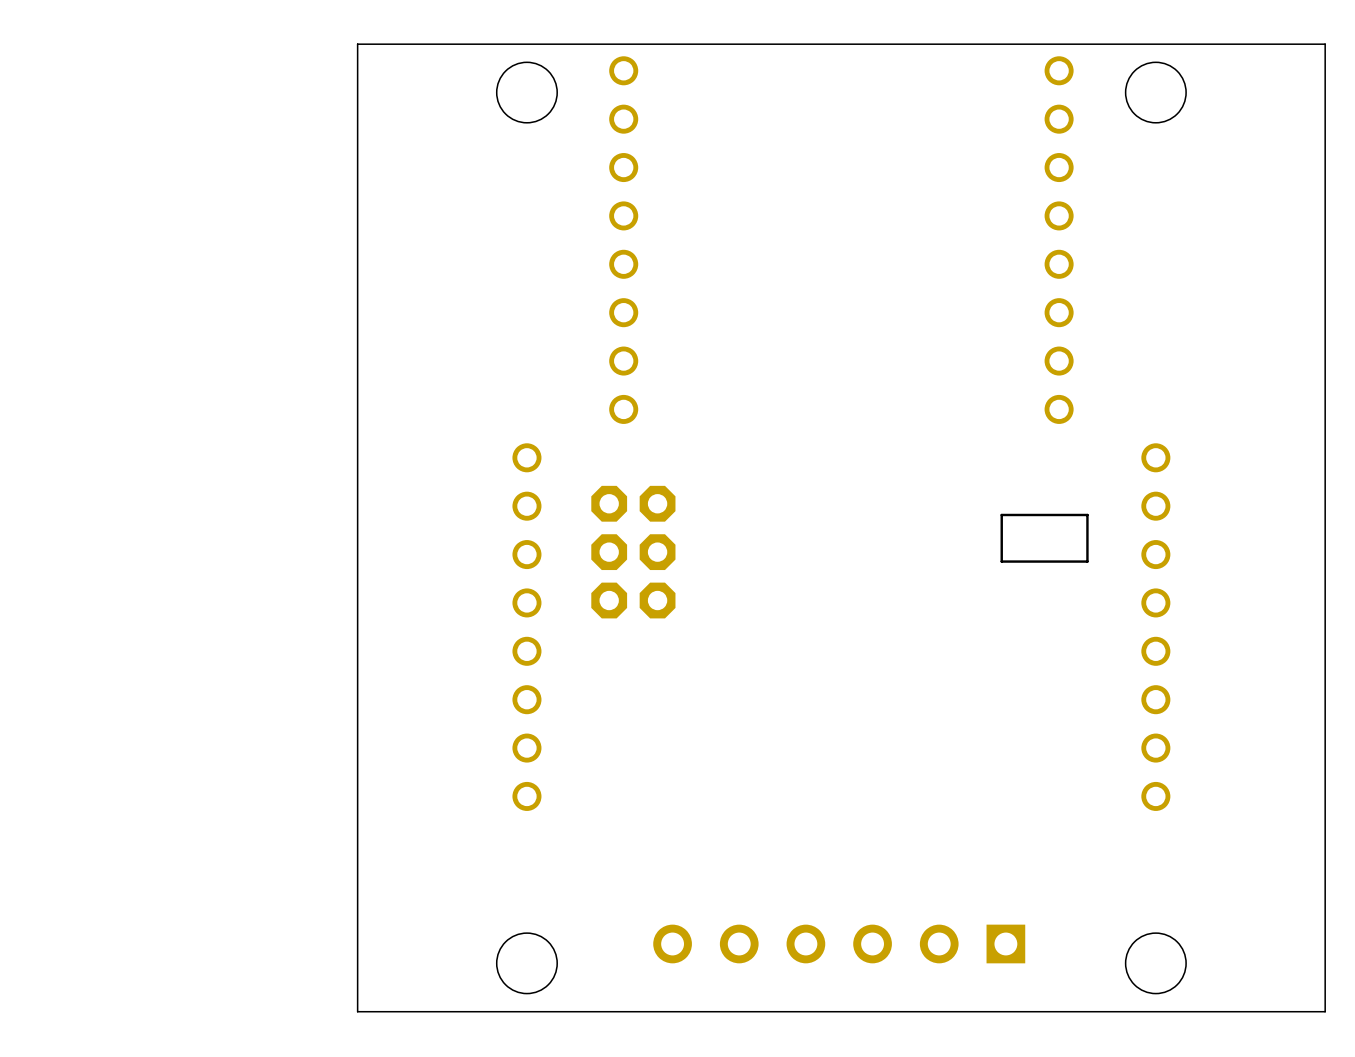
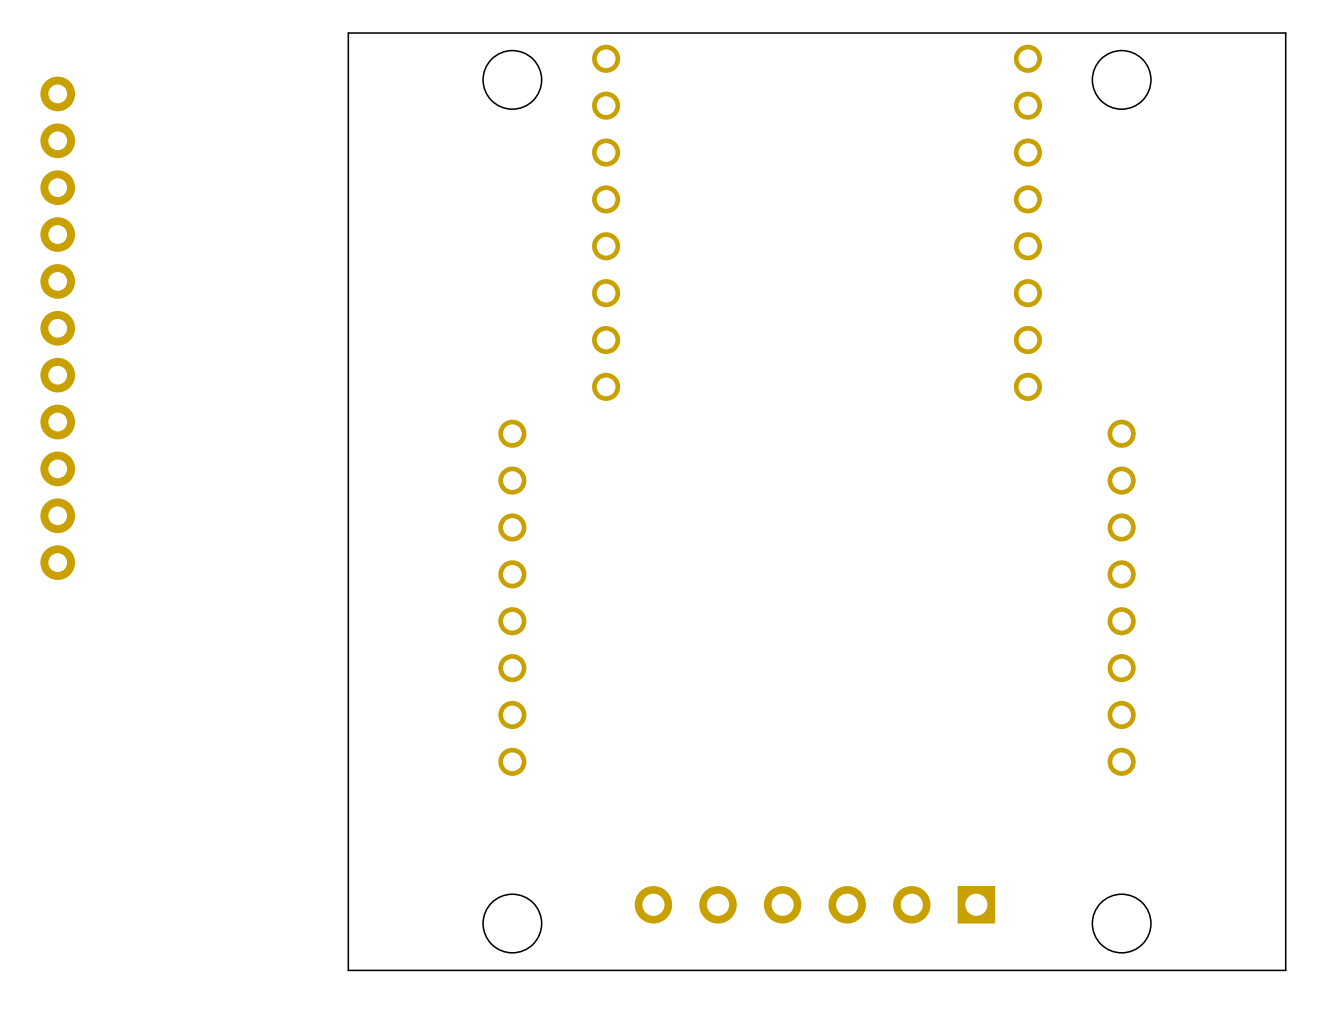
part: none -> (57, 328)
part: (1044, 538) -> none
part: (633, 552) -> none

